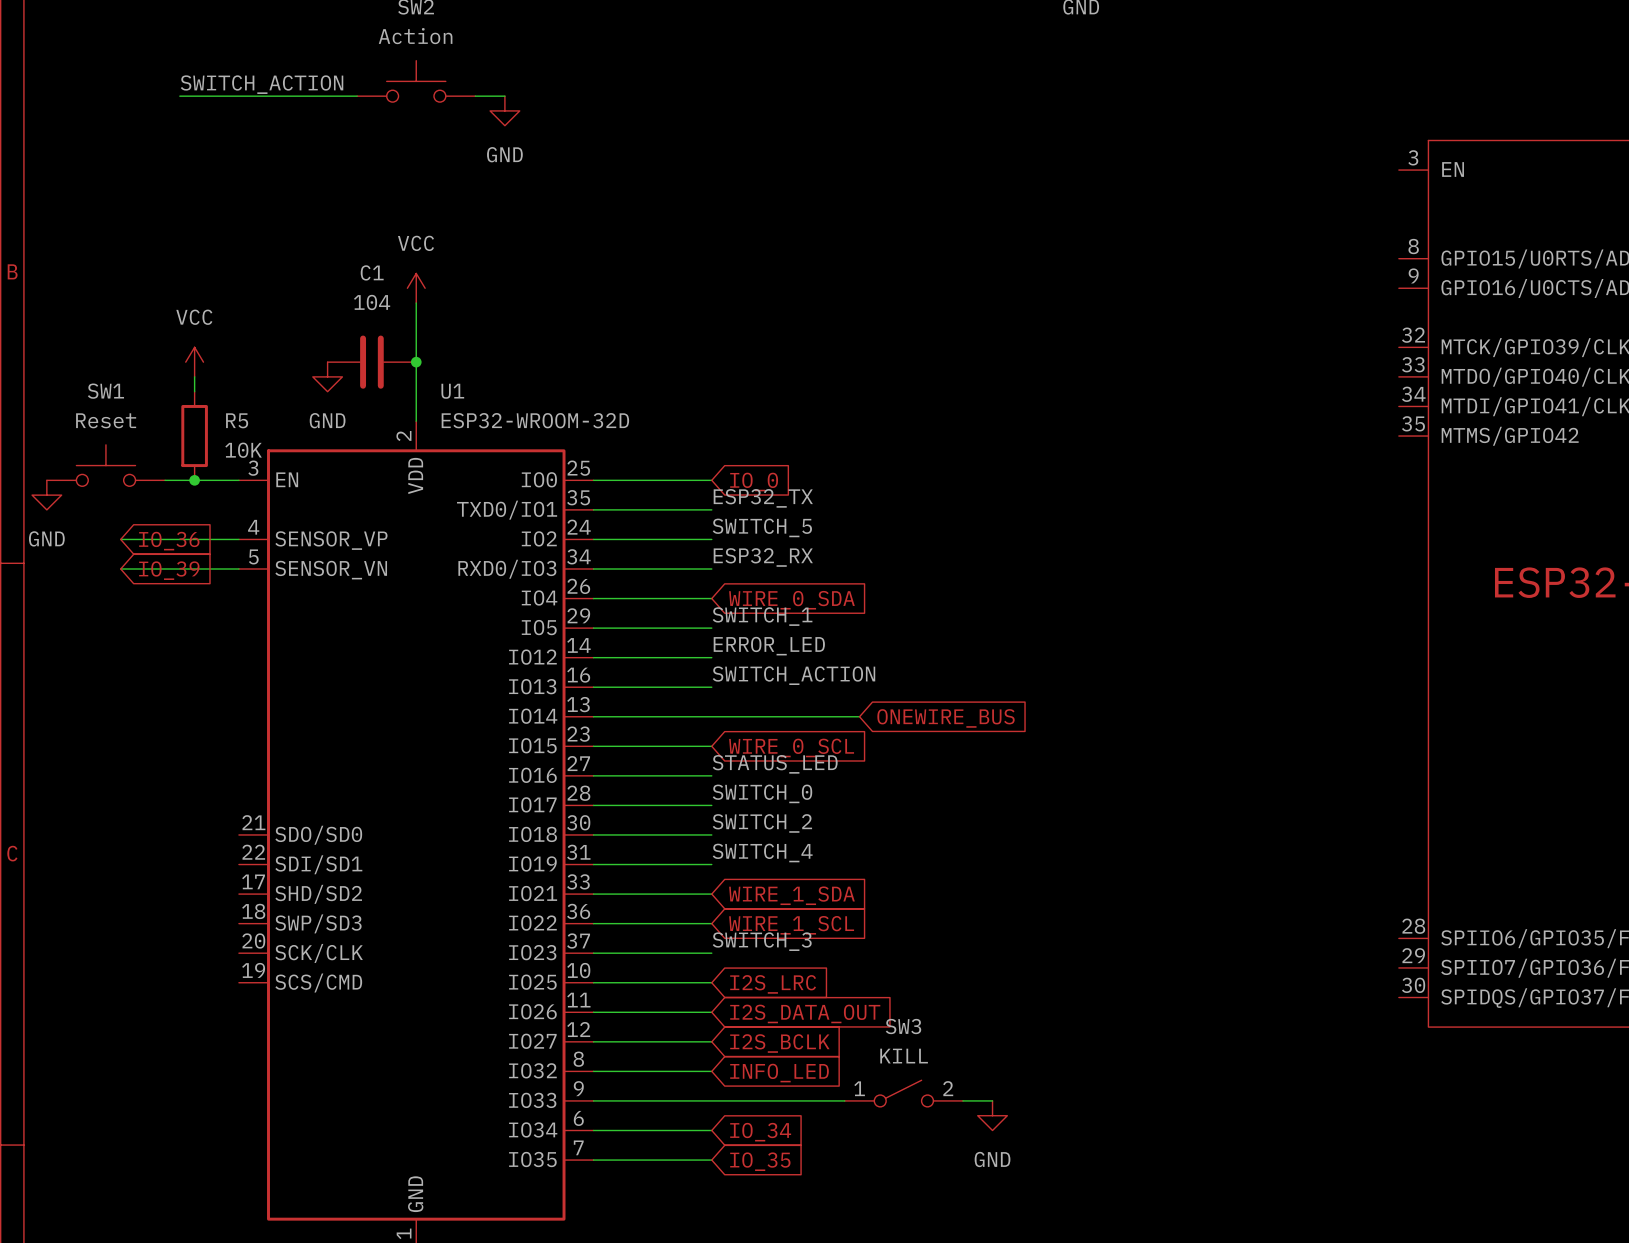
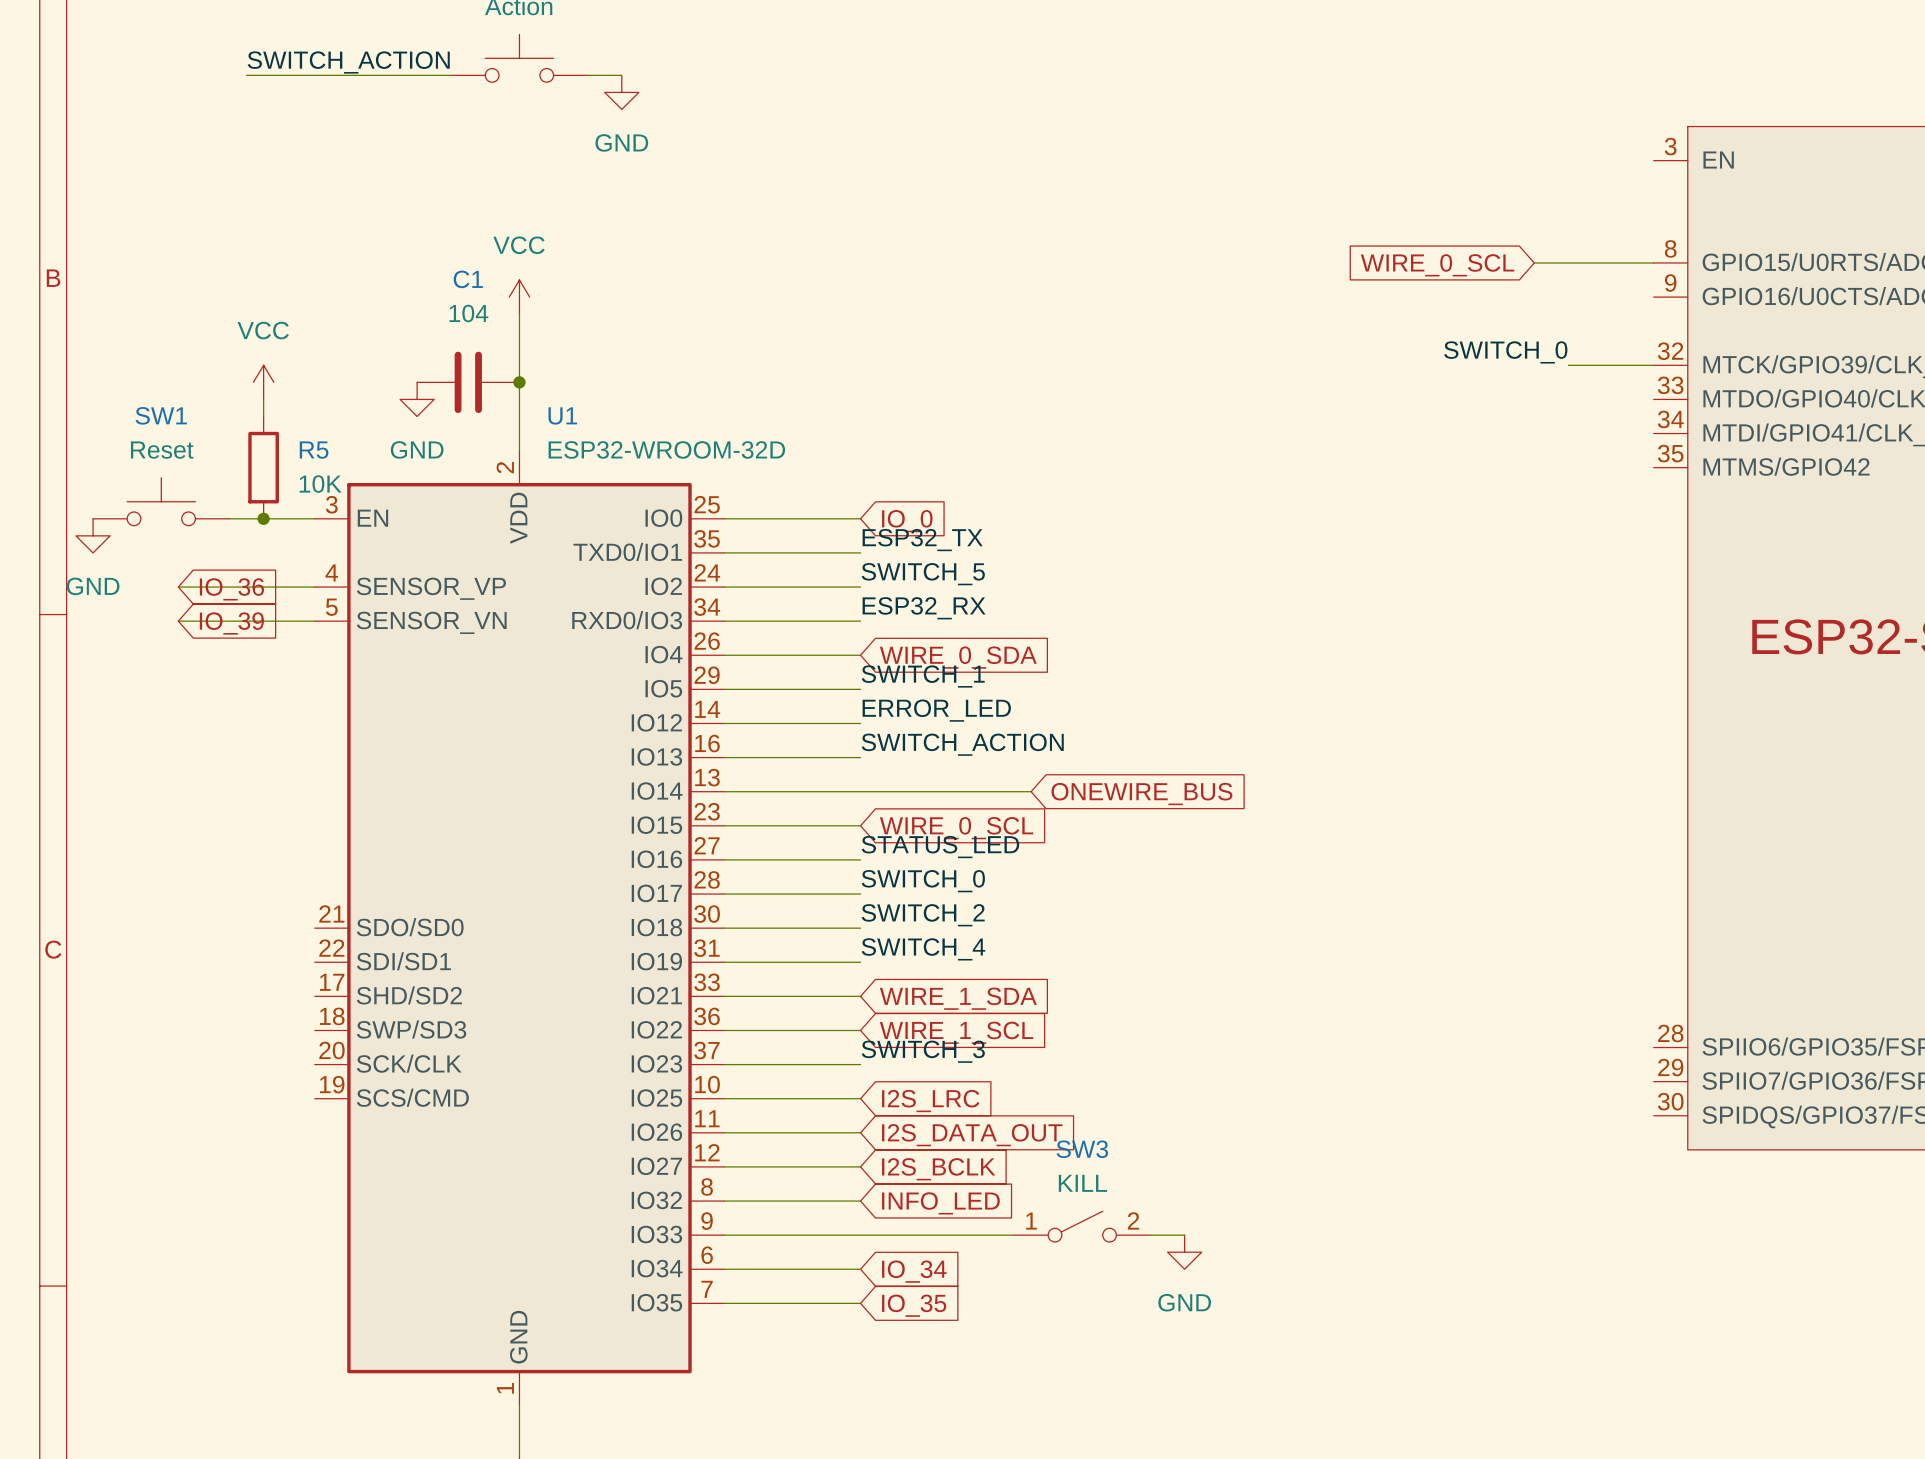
wire: none -> (1534, 262) (1653, 262)
global label: none -> WIRE_0_SCL (1437, 265)
label: none -> SWITCH_0 (1505, 352)
wire: none -> (1568, 365) (1653, 365)

